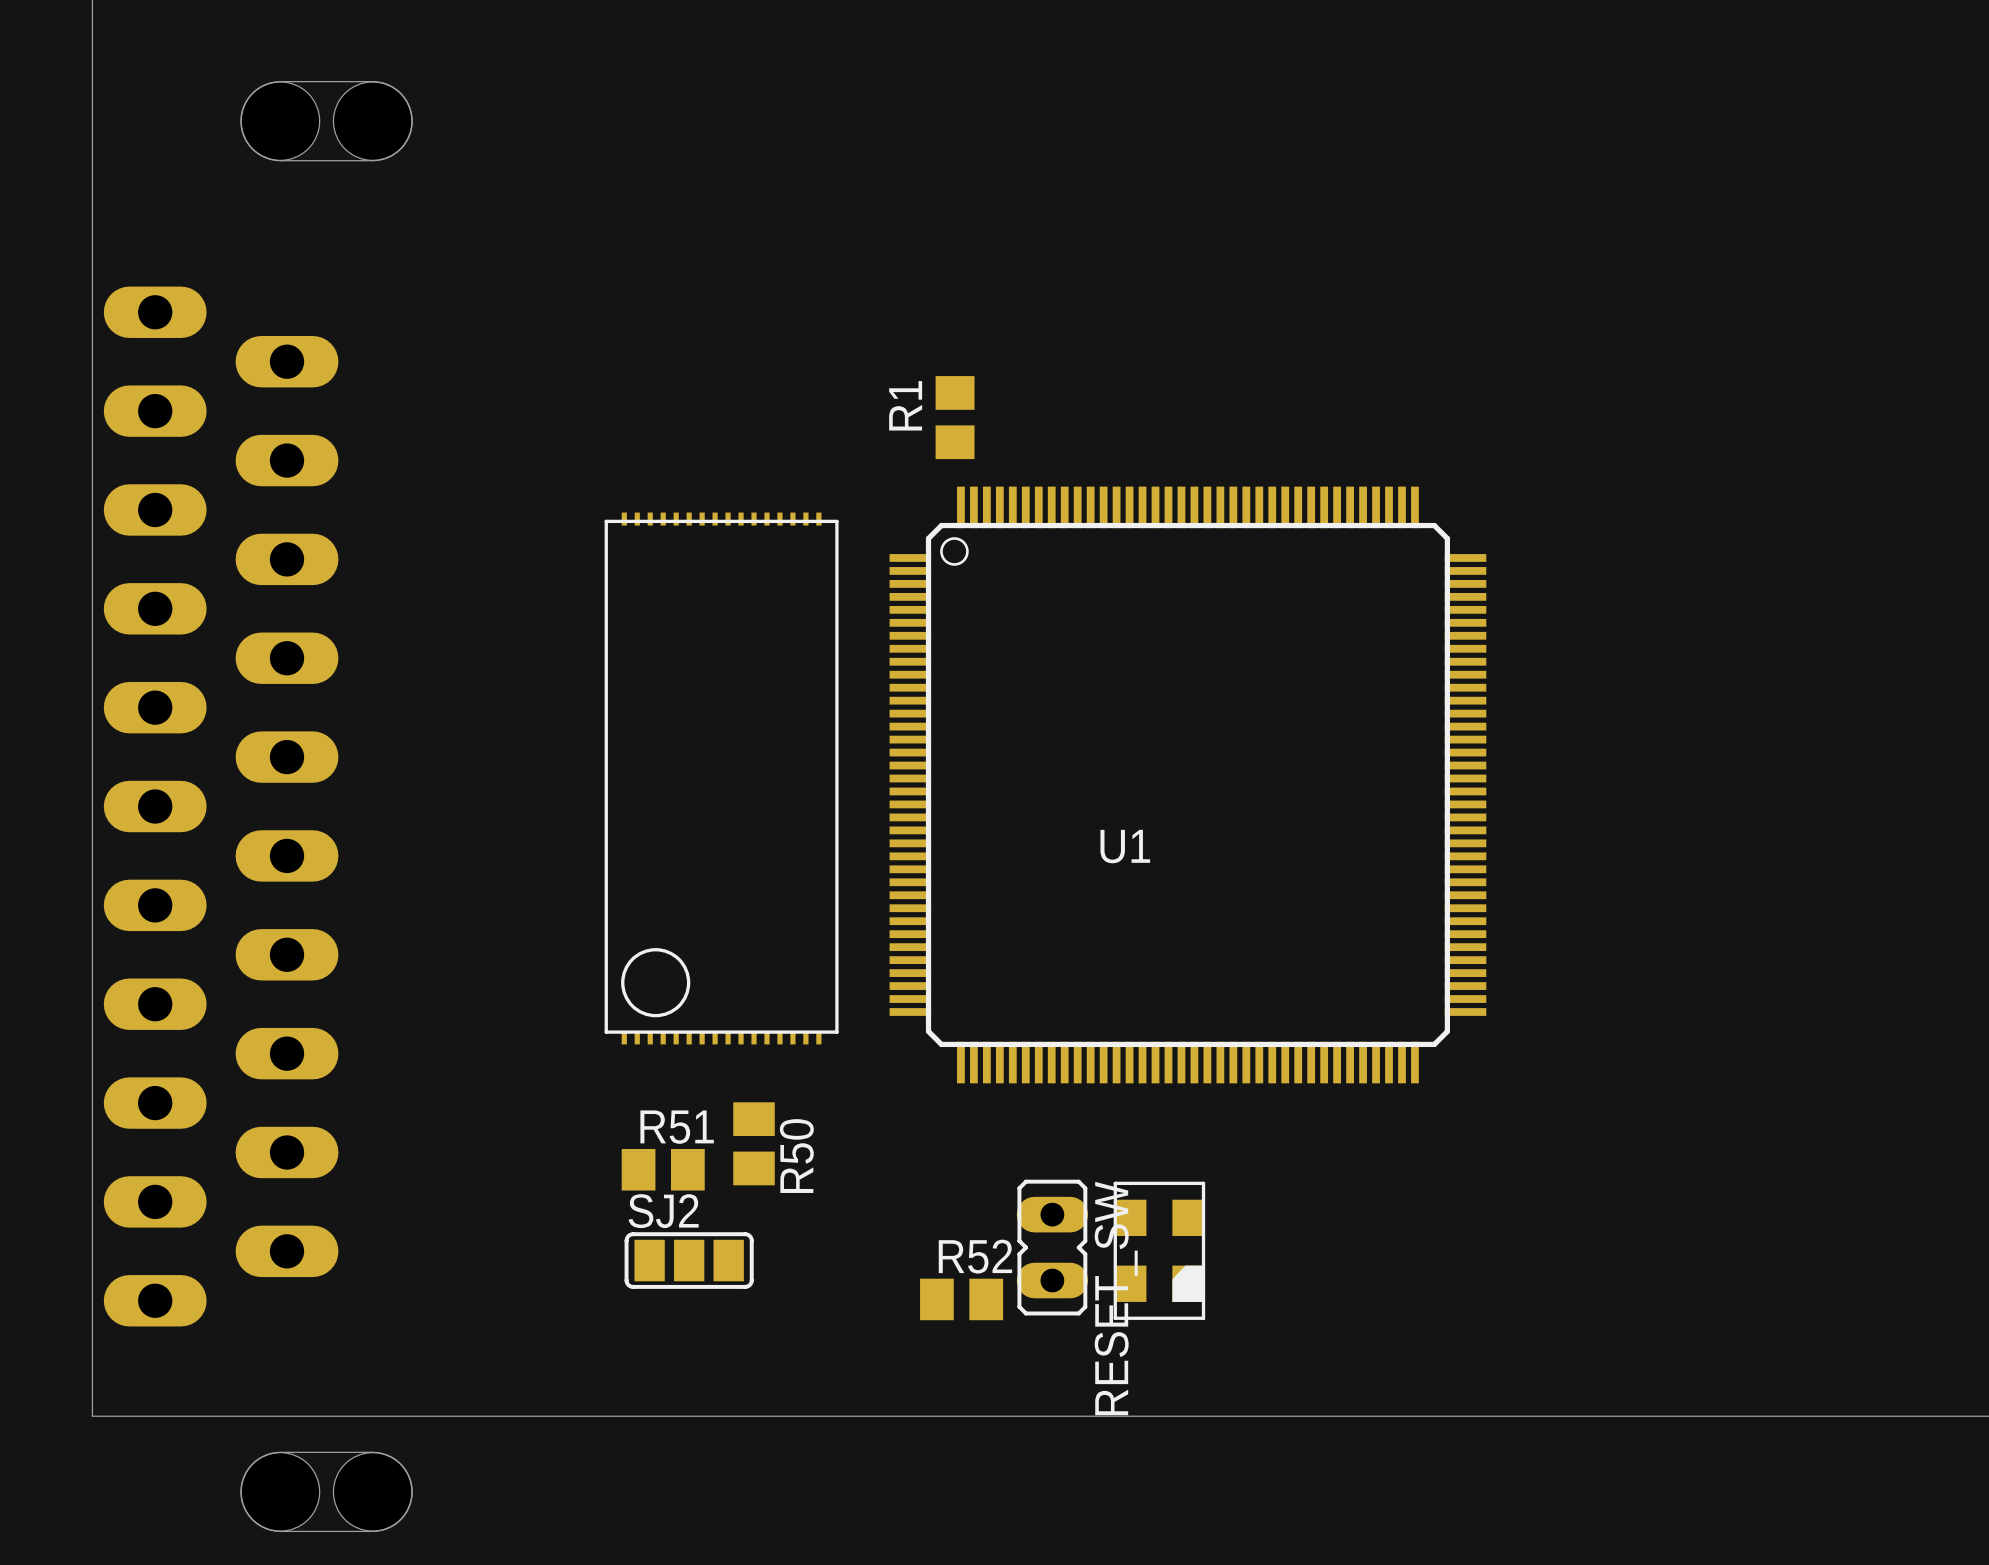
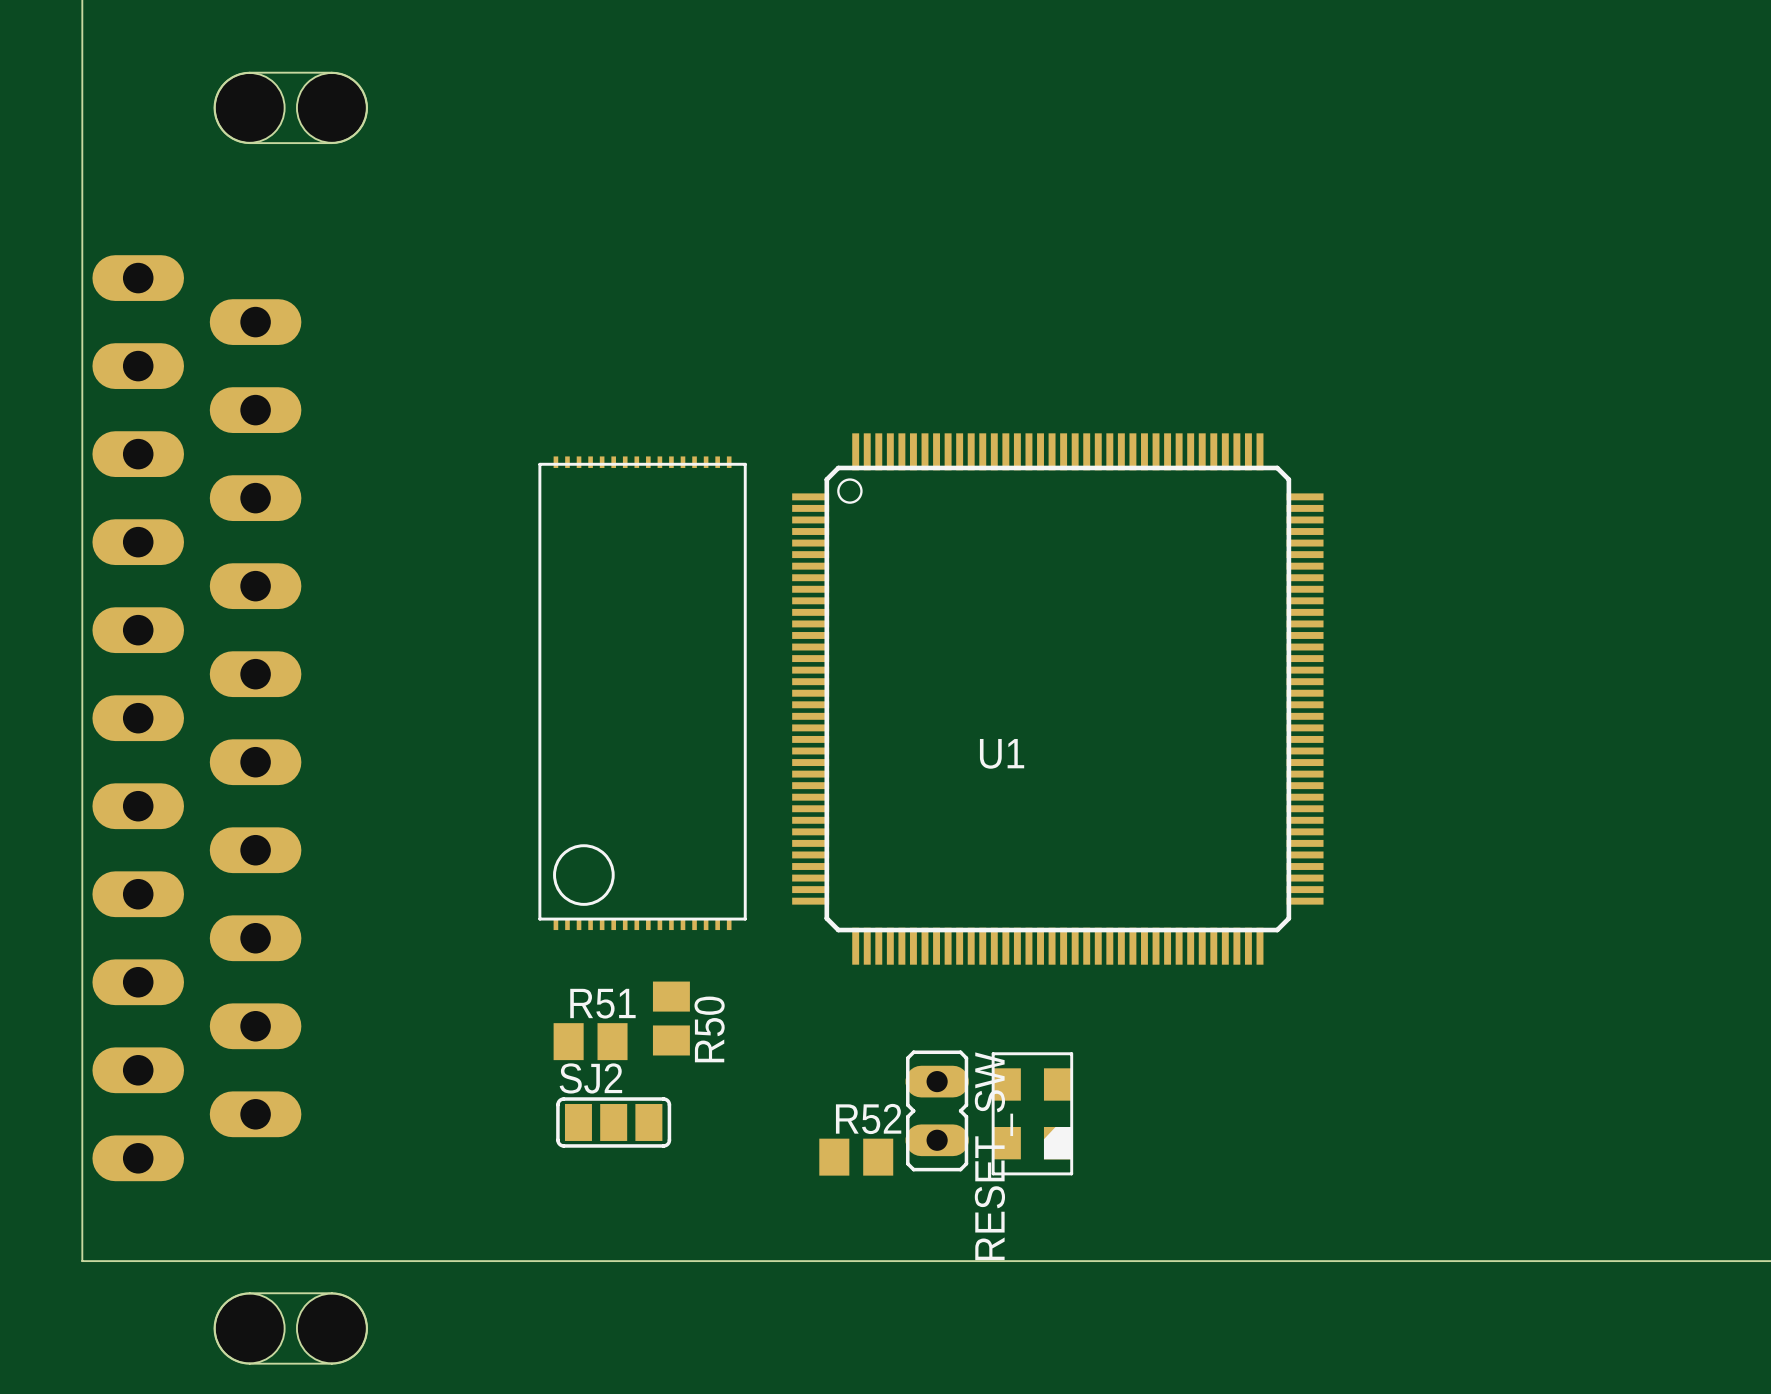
R1: (955, 417) -> none

